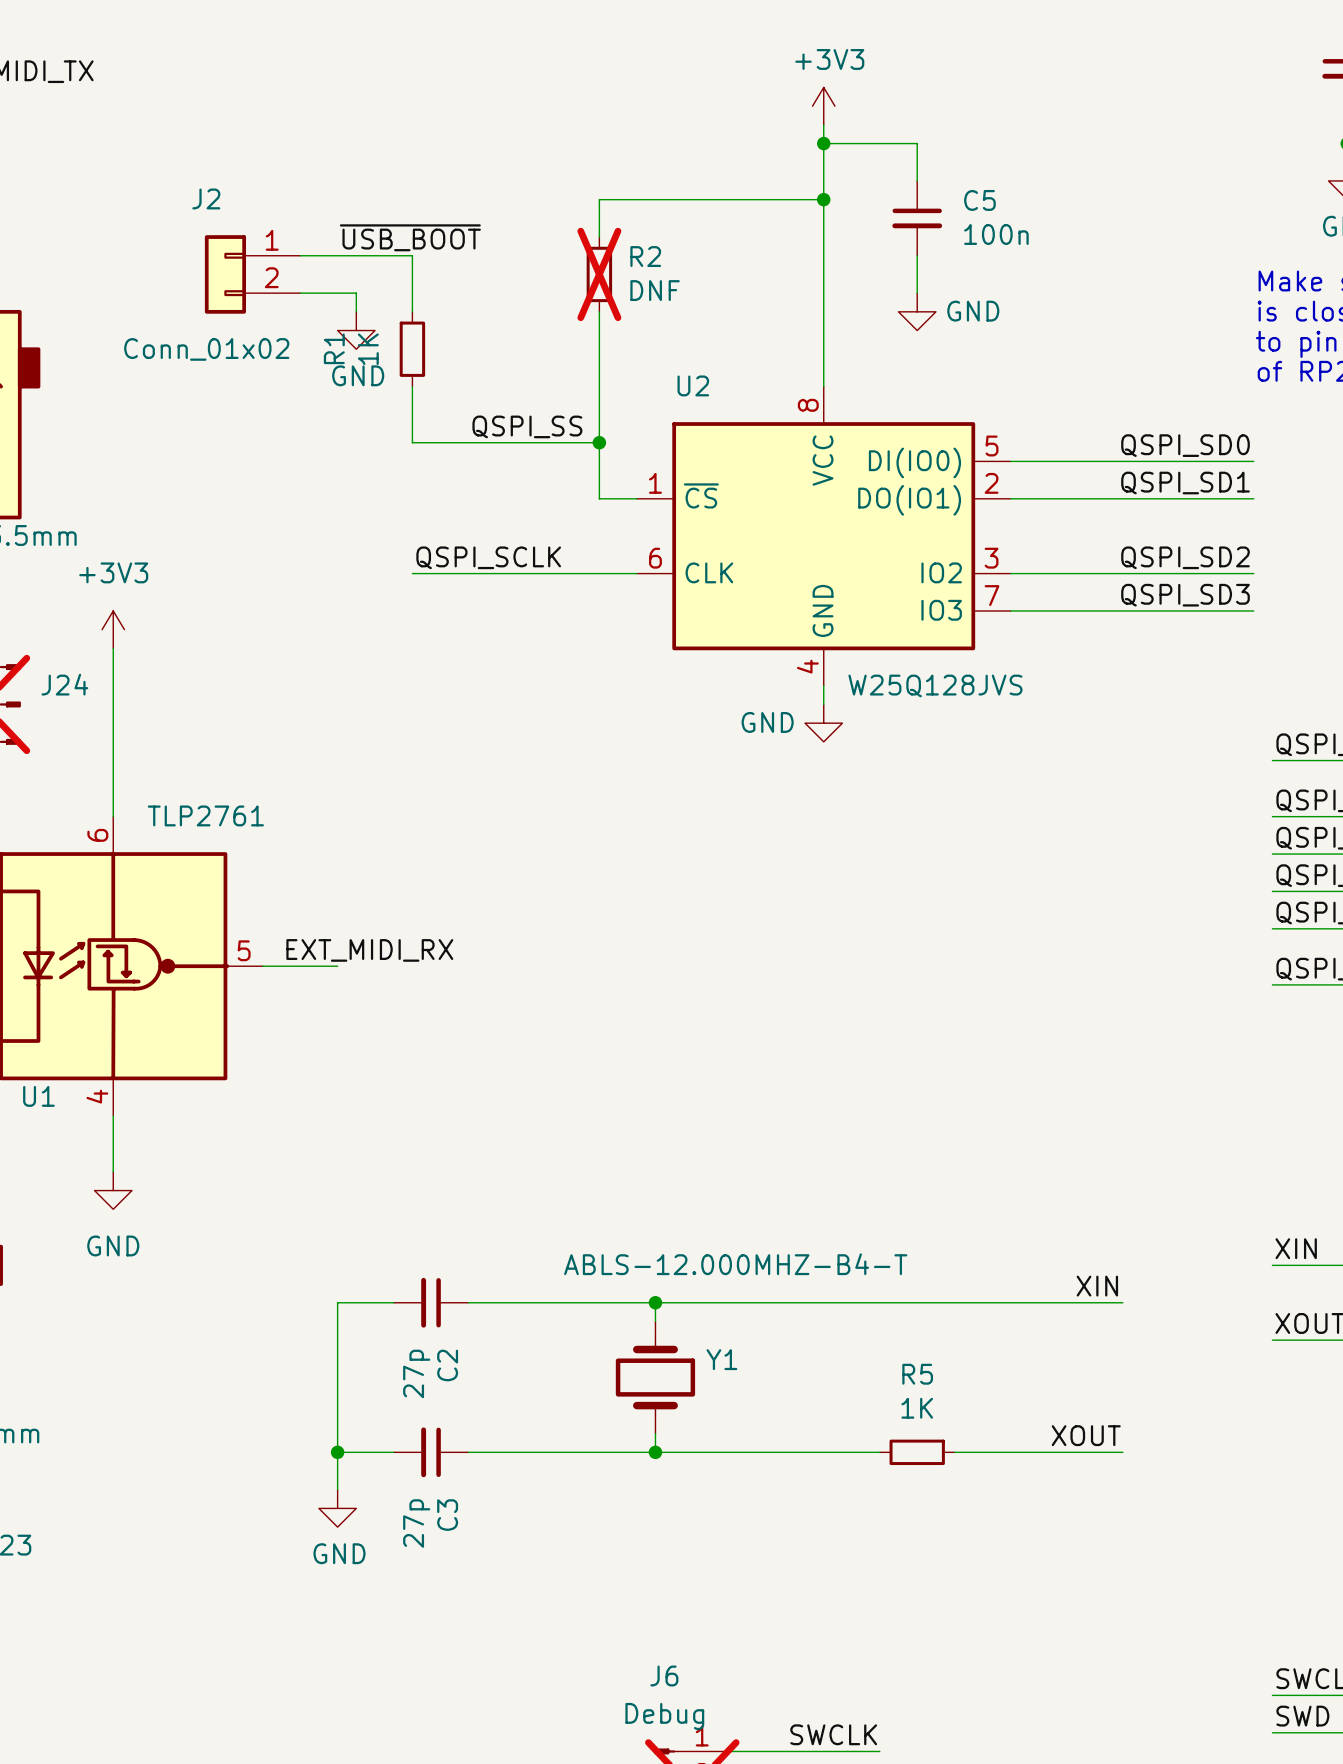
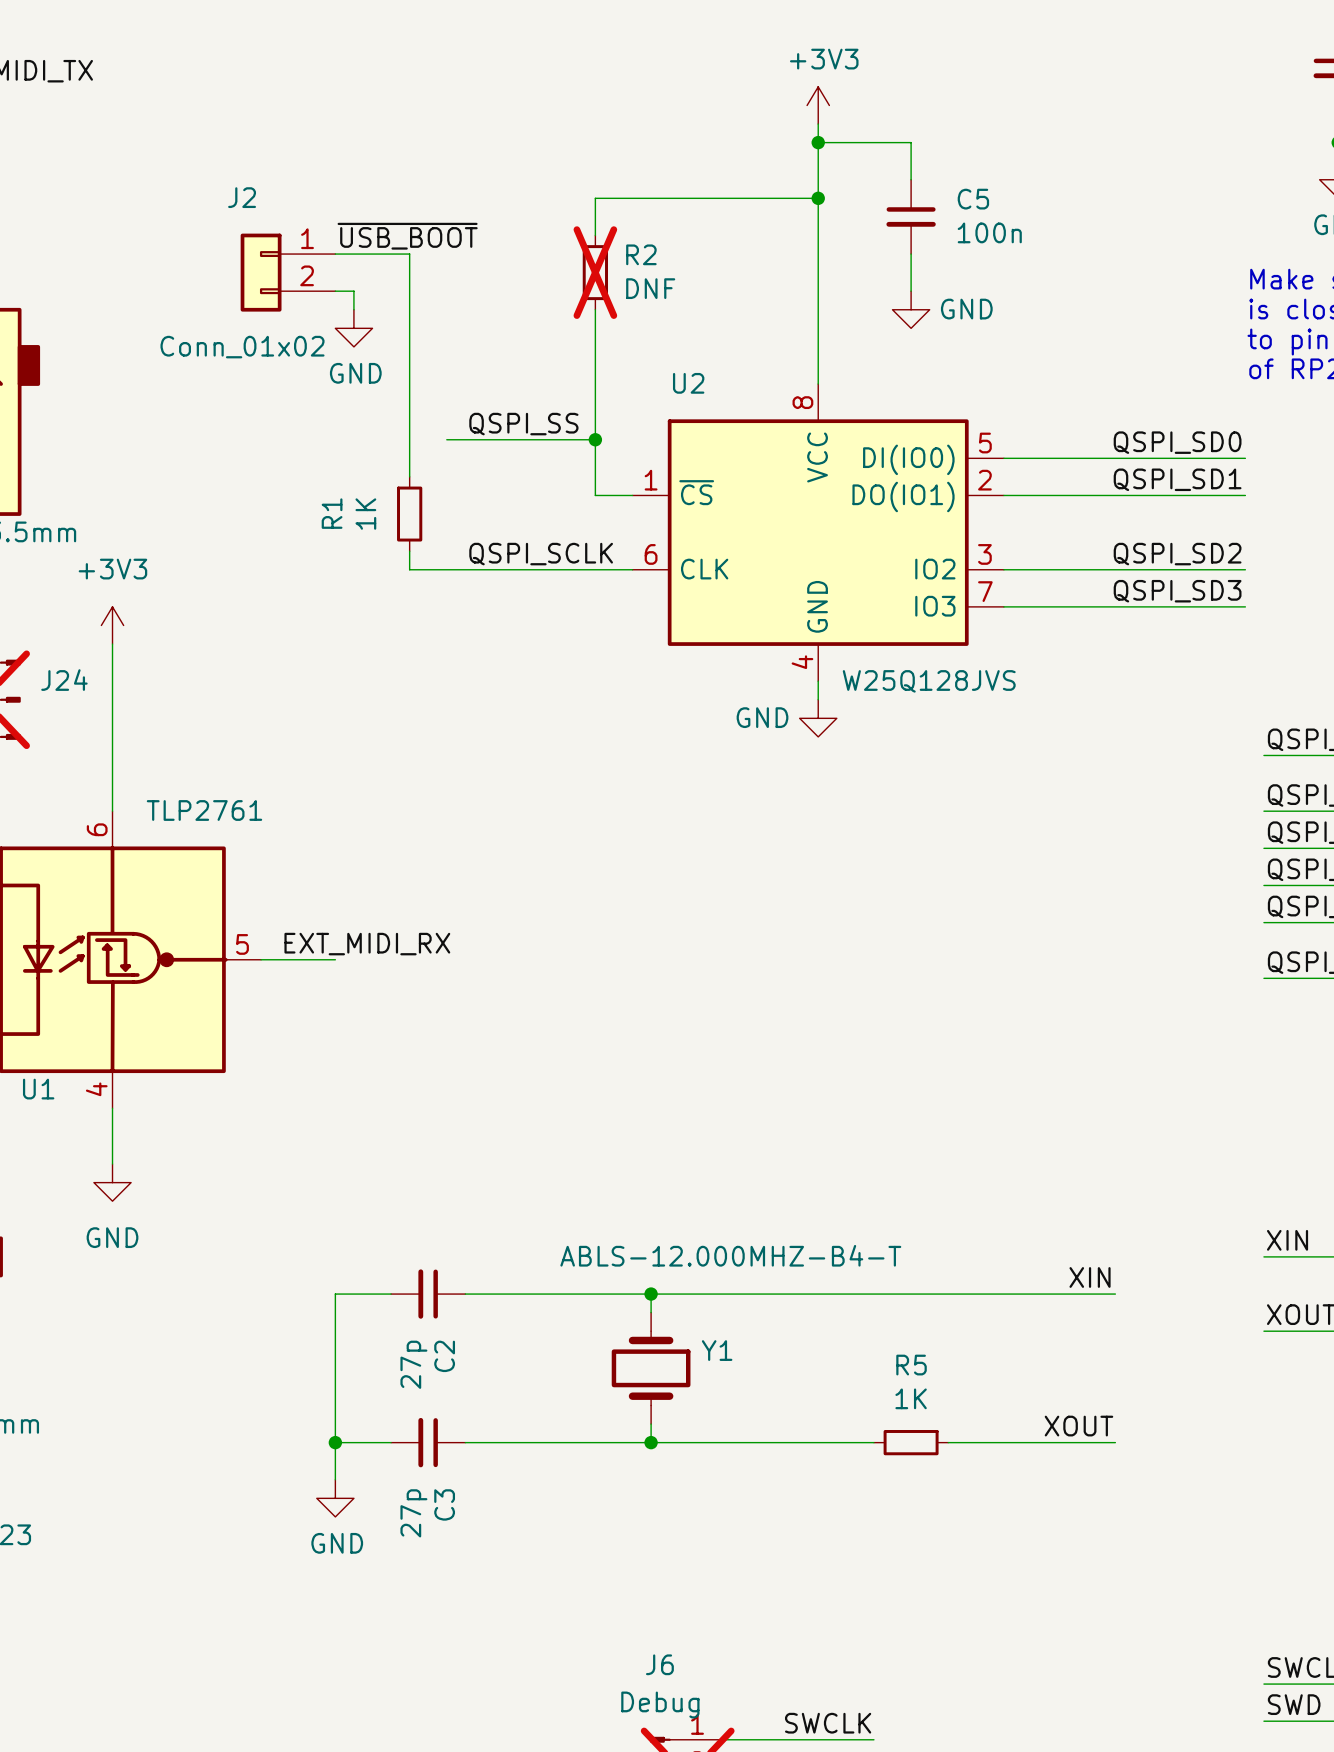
J2 position: (252, 274) -> (288, 272)
wire: none -> (409, 309) (409, 384)
R1 position: (412, 349) -> (409, 514)
wire: (412, 442) (449, 442) -> (409, 439) (409, 476)
wire: none -> (409, 551) (409, 569)
label position: QSPI_SCLK (488, 557) -> QSPI_SCLK (541, 554)

